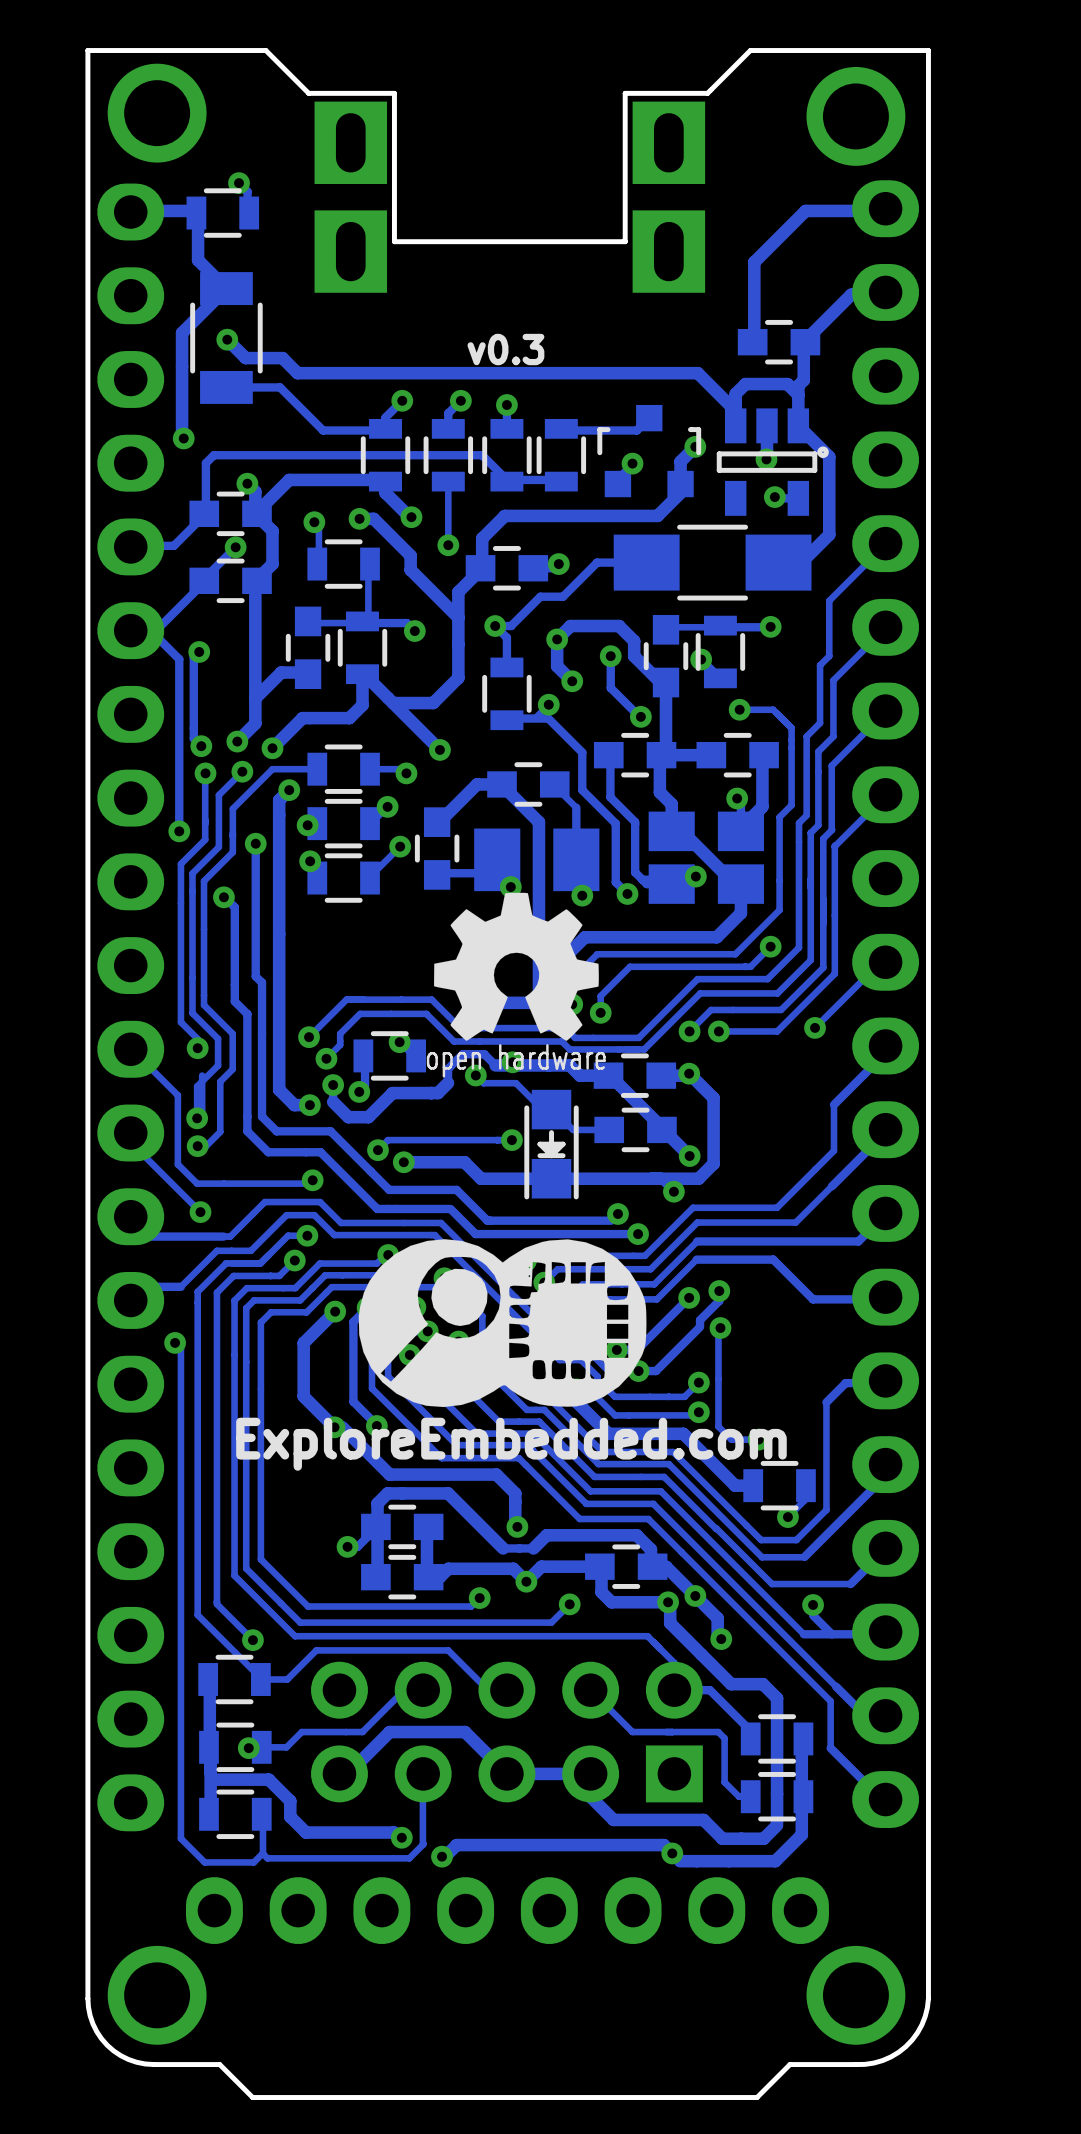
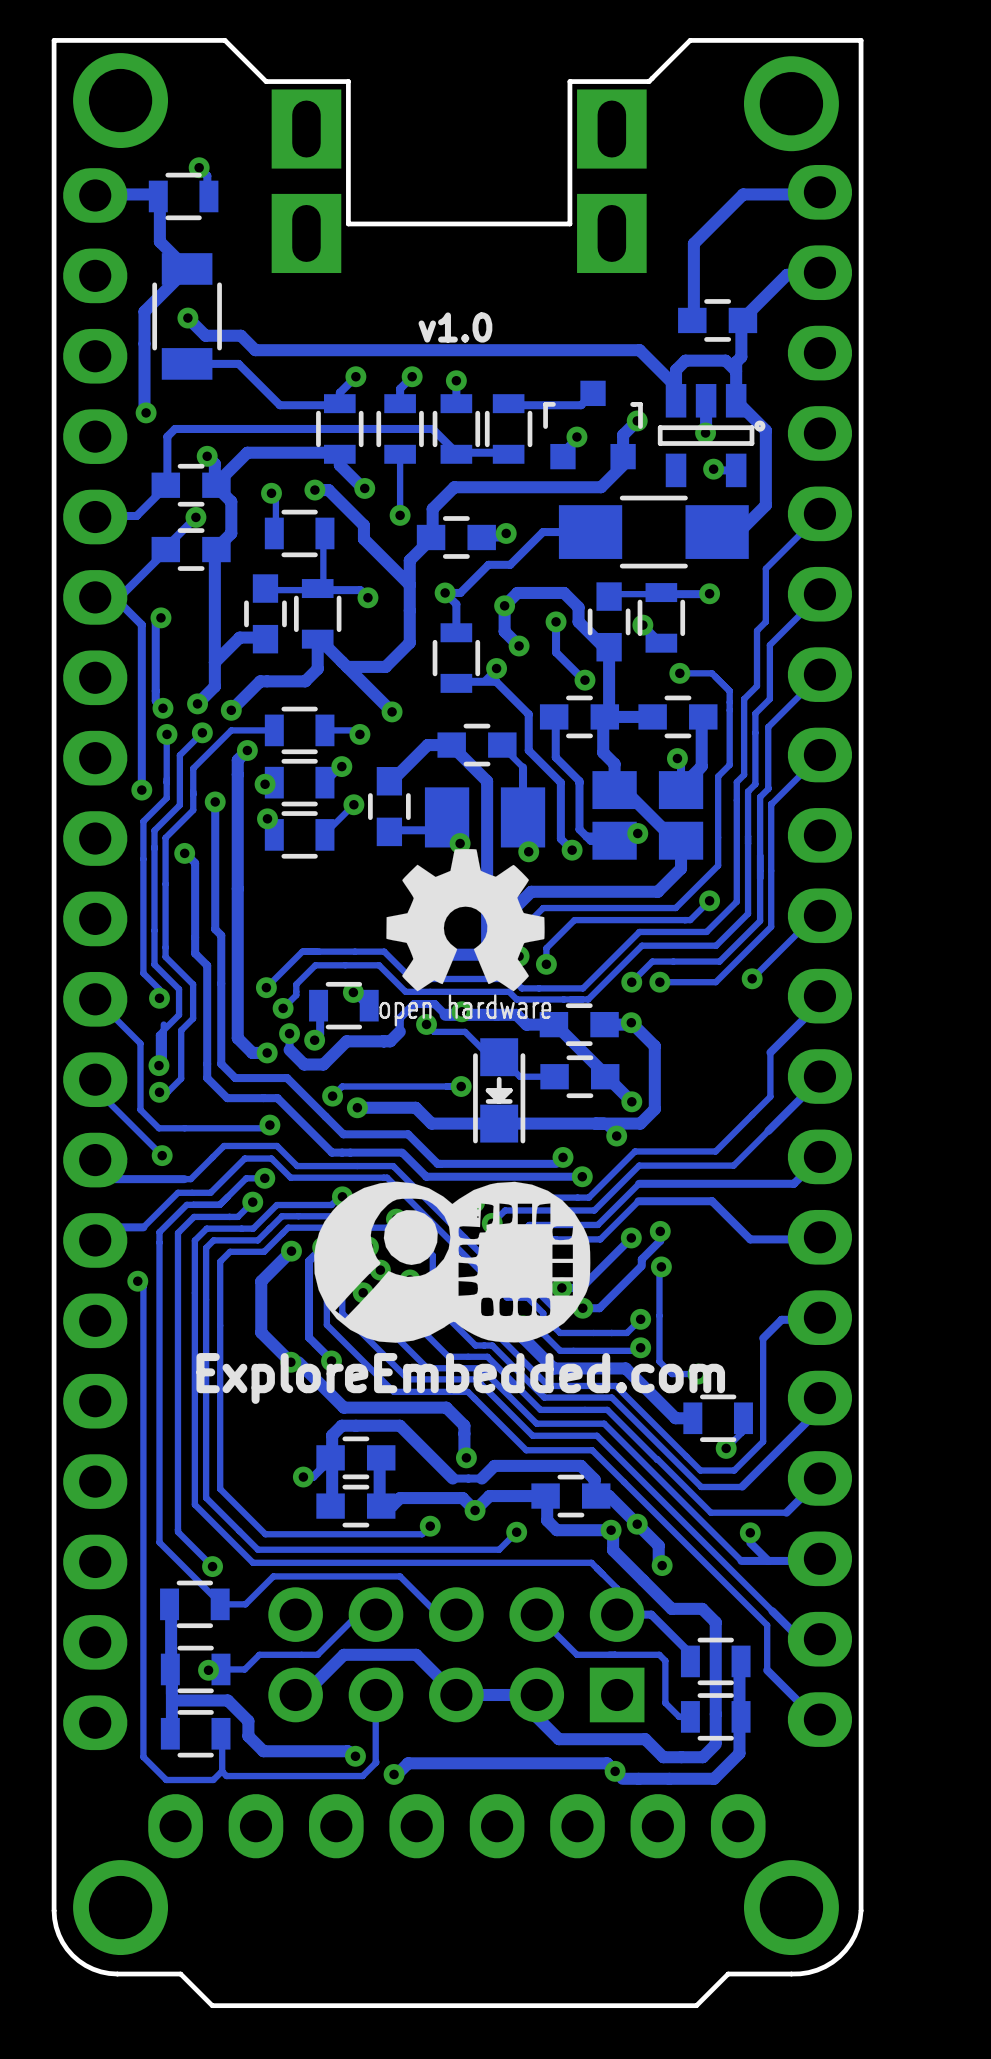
text: v0.3 (505, 349) -> v1.0 (455, 327)

